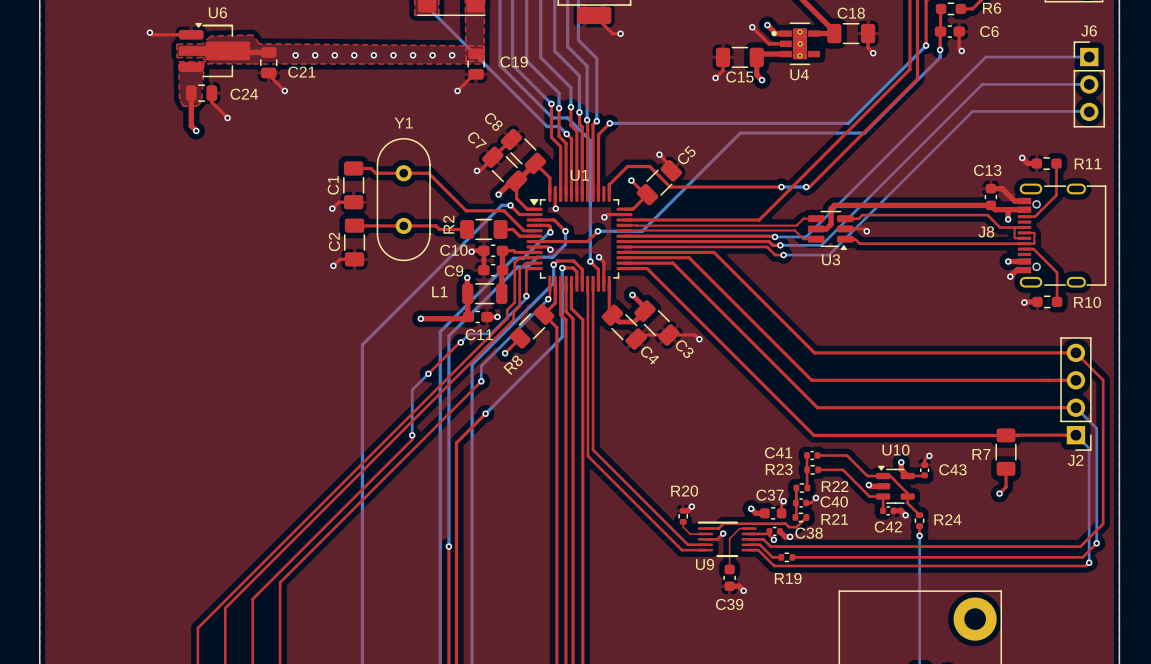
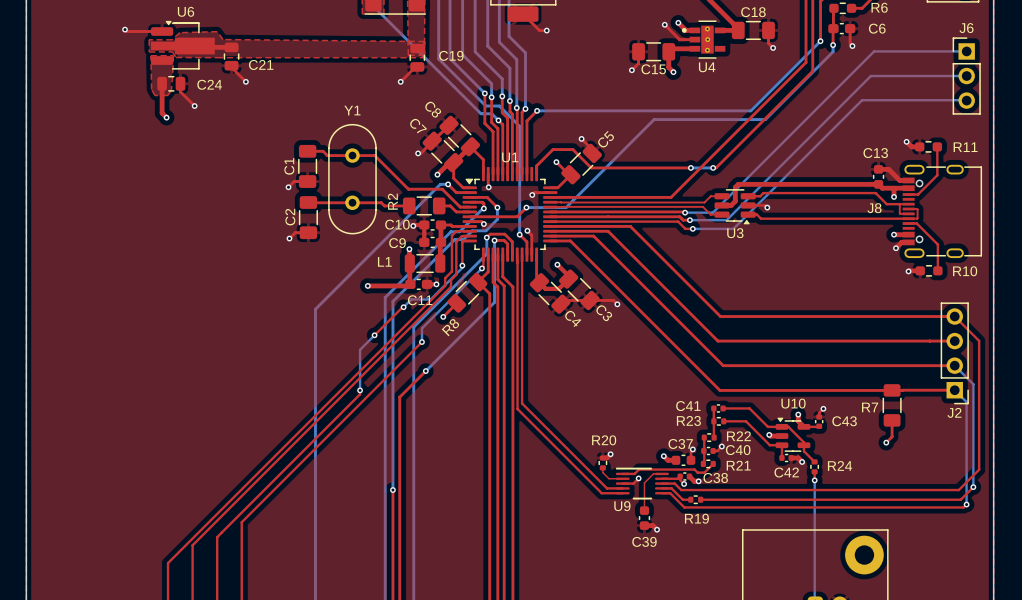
via: (295, 55) -> none
via: (315, 55) -> none
via: (334, 55) -> none
via: (354, 55) -> none
via: (373, 55) -> none
via: (393, 55) -> none
via: (413, 55) -> none
via: (432, 55) -> none
via: (452, 55) -> none

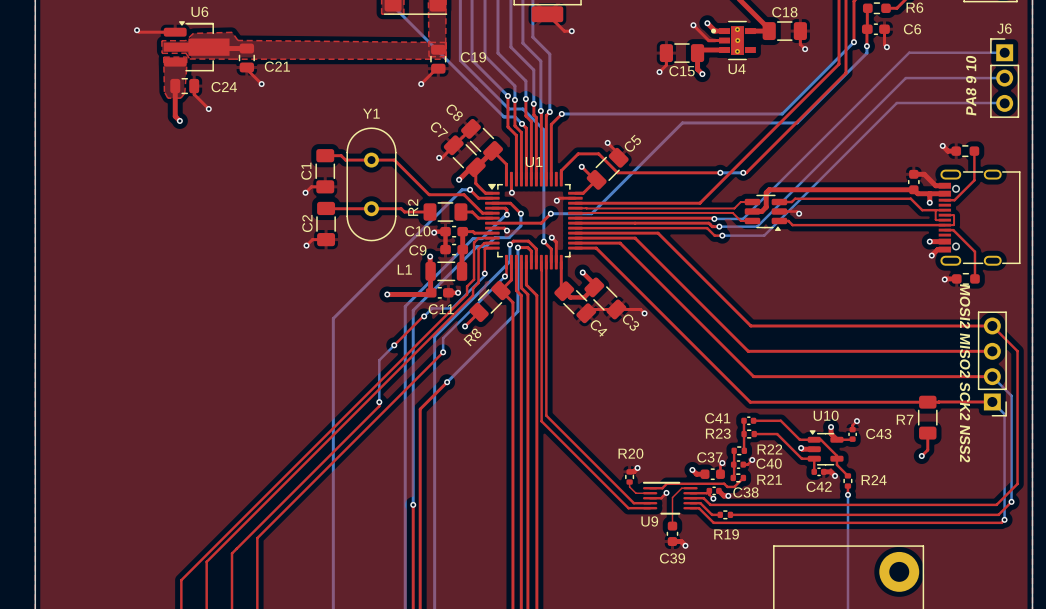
text: none -> PA8 9 10 (971, 85)
R11 name: R11 (965, 147) -> none
C13 name: C13 (875, 153) -> none
J8 name: J8 (874, 208) -> none
U3 name: U3 (735, 233) -> none
R10 name: R10 (965, 271) -> none
text: none -> MOSI2 MISO2 SCK2 NSS2 (965, 373)
J2 name: J2 (954, 412) -> none

